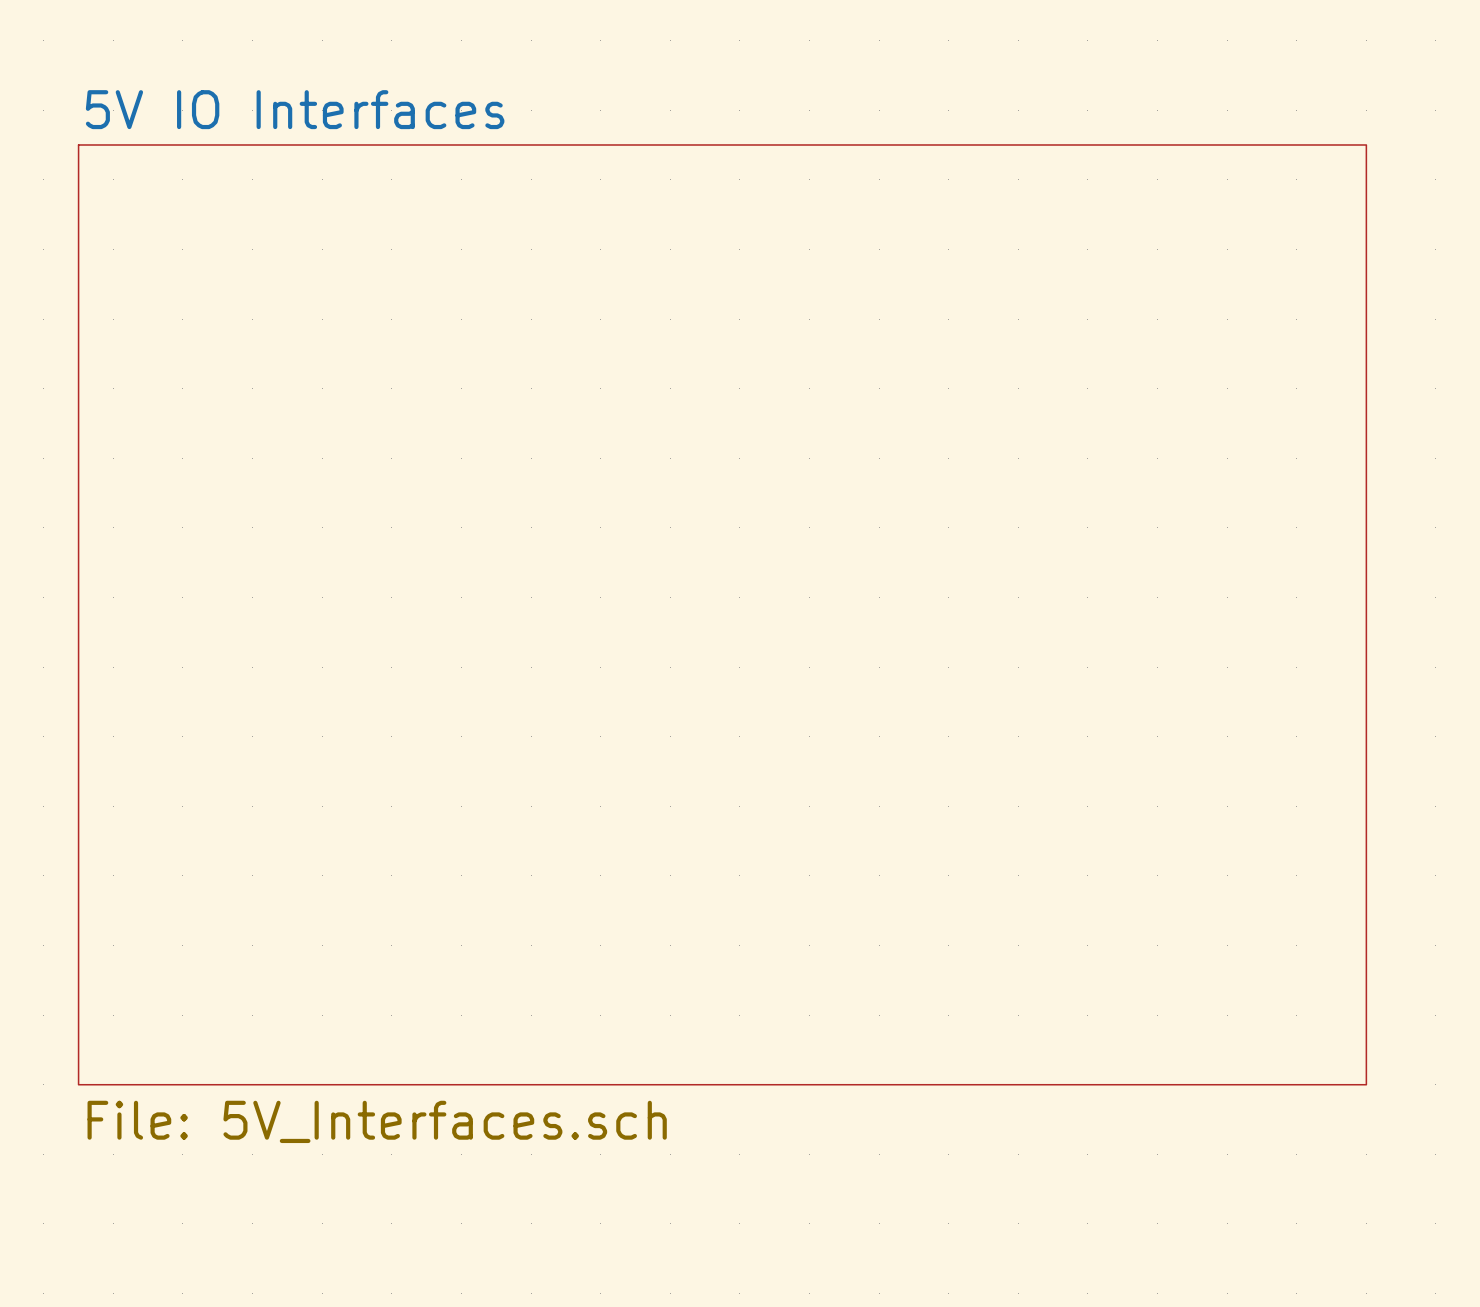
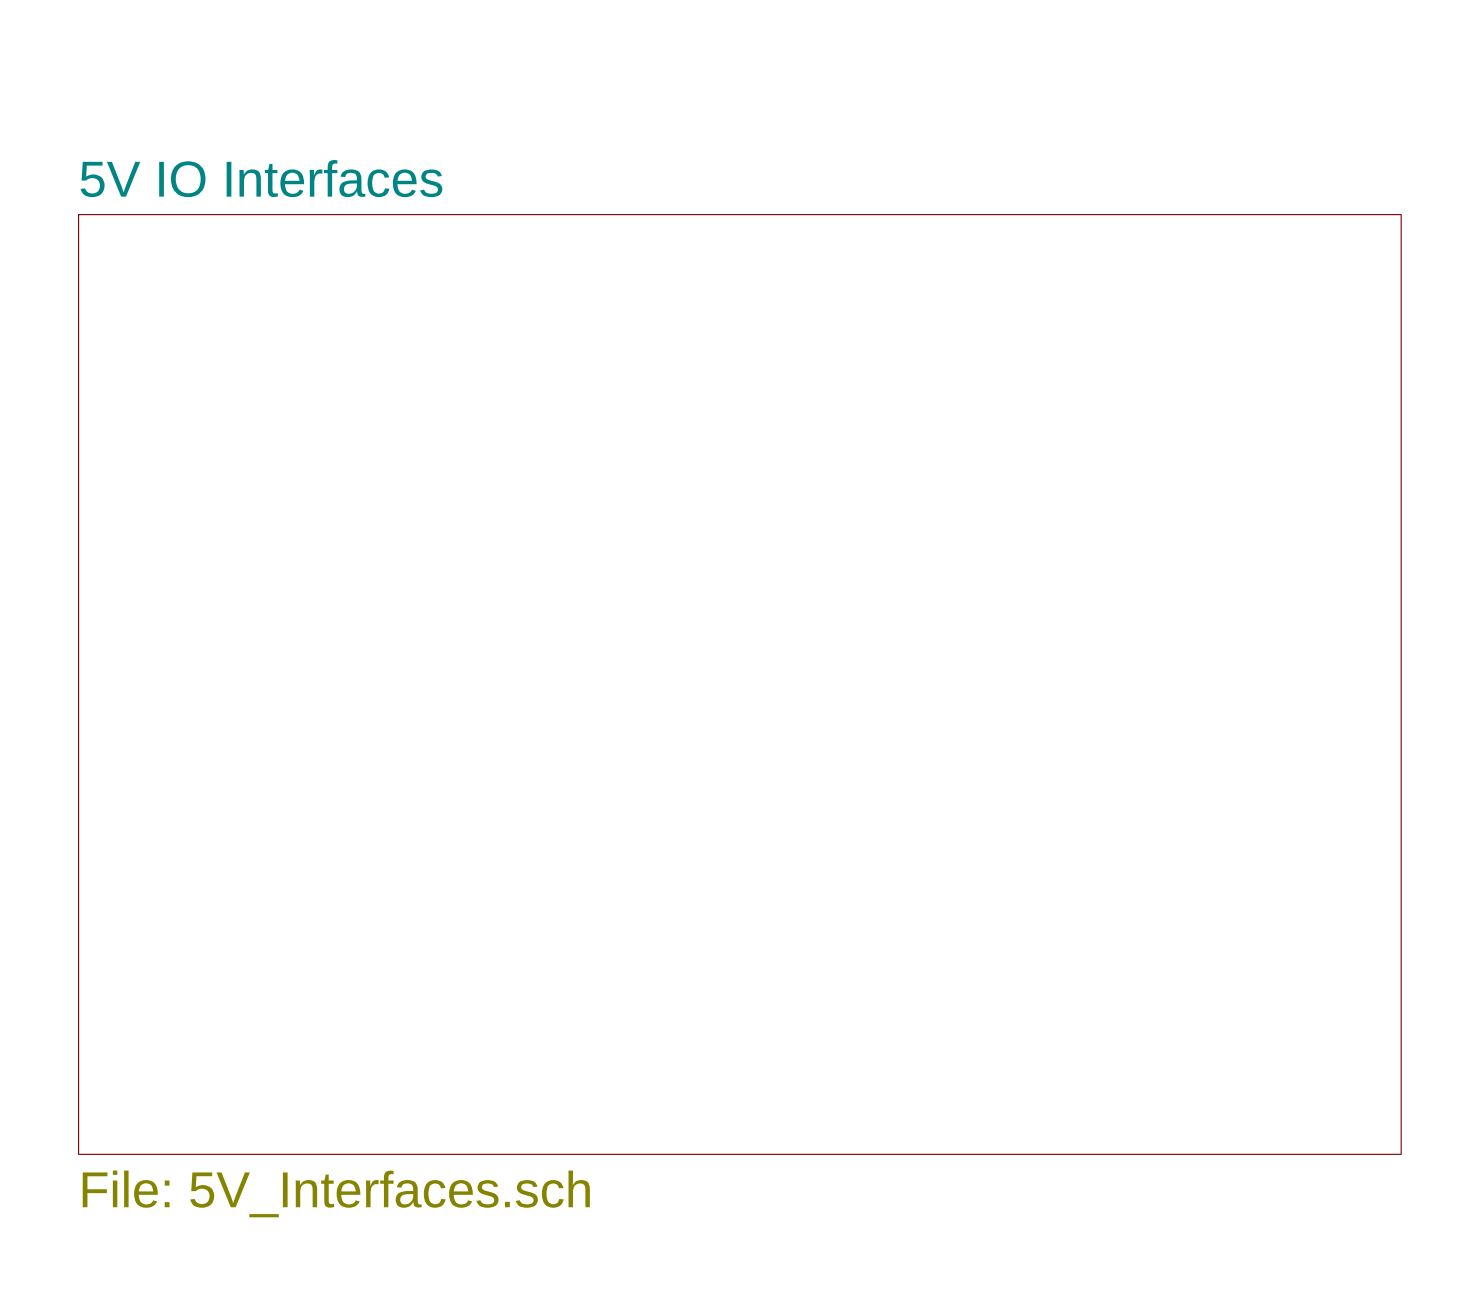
sheet 5V IO Interfaces shape: [78, 144, 1367, 1085] -> [78, 214, 1402, 1155]

